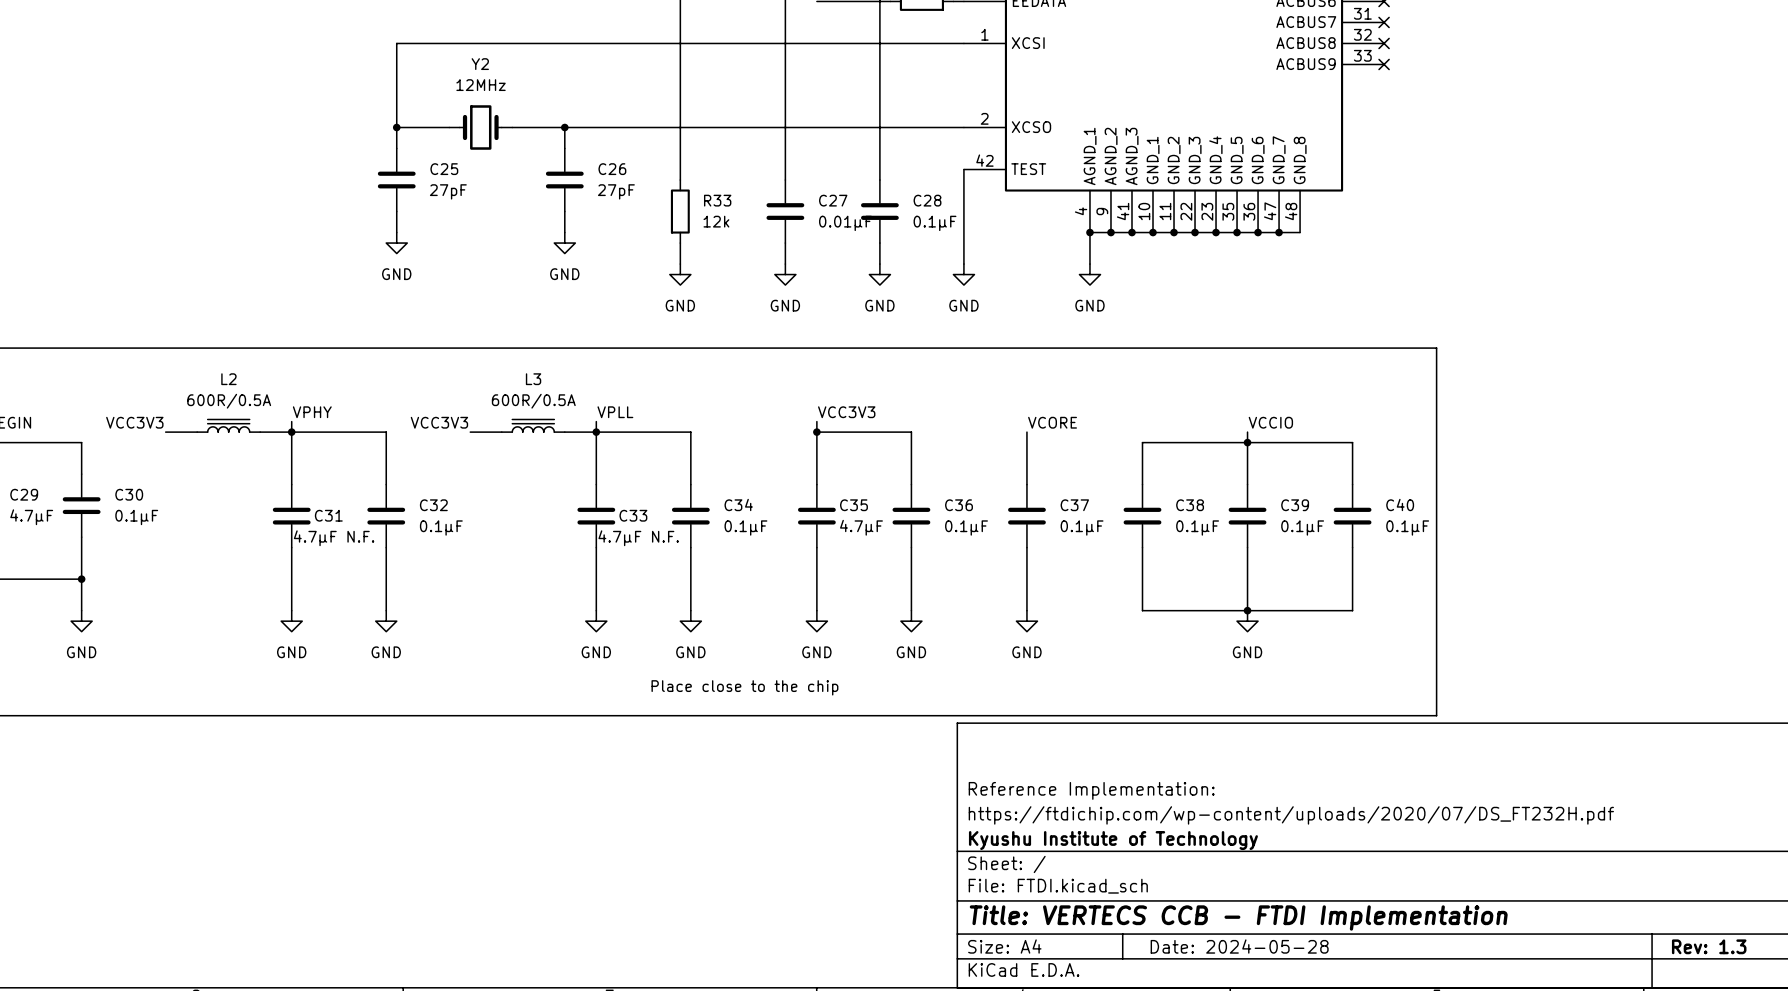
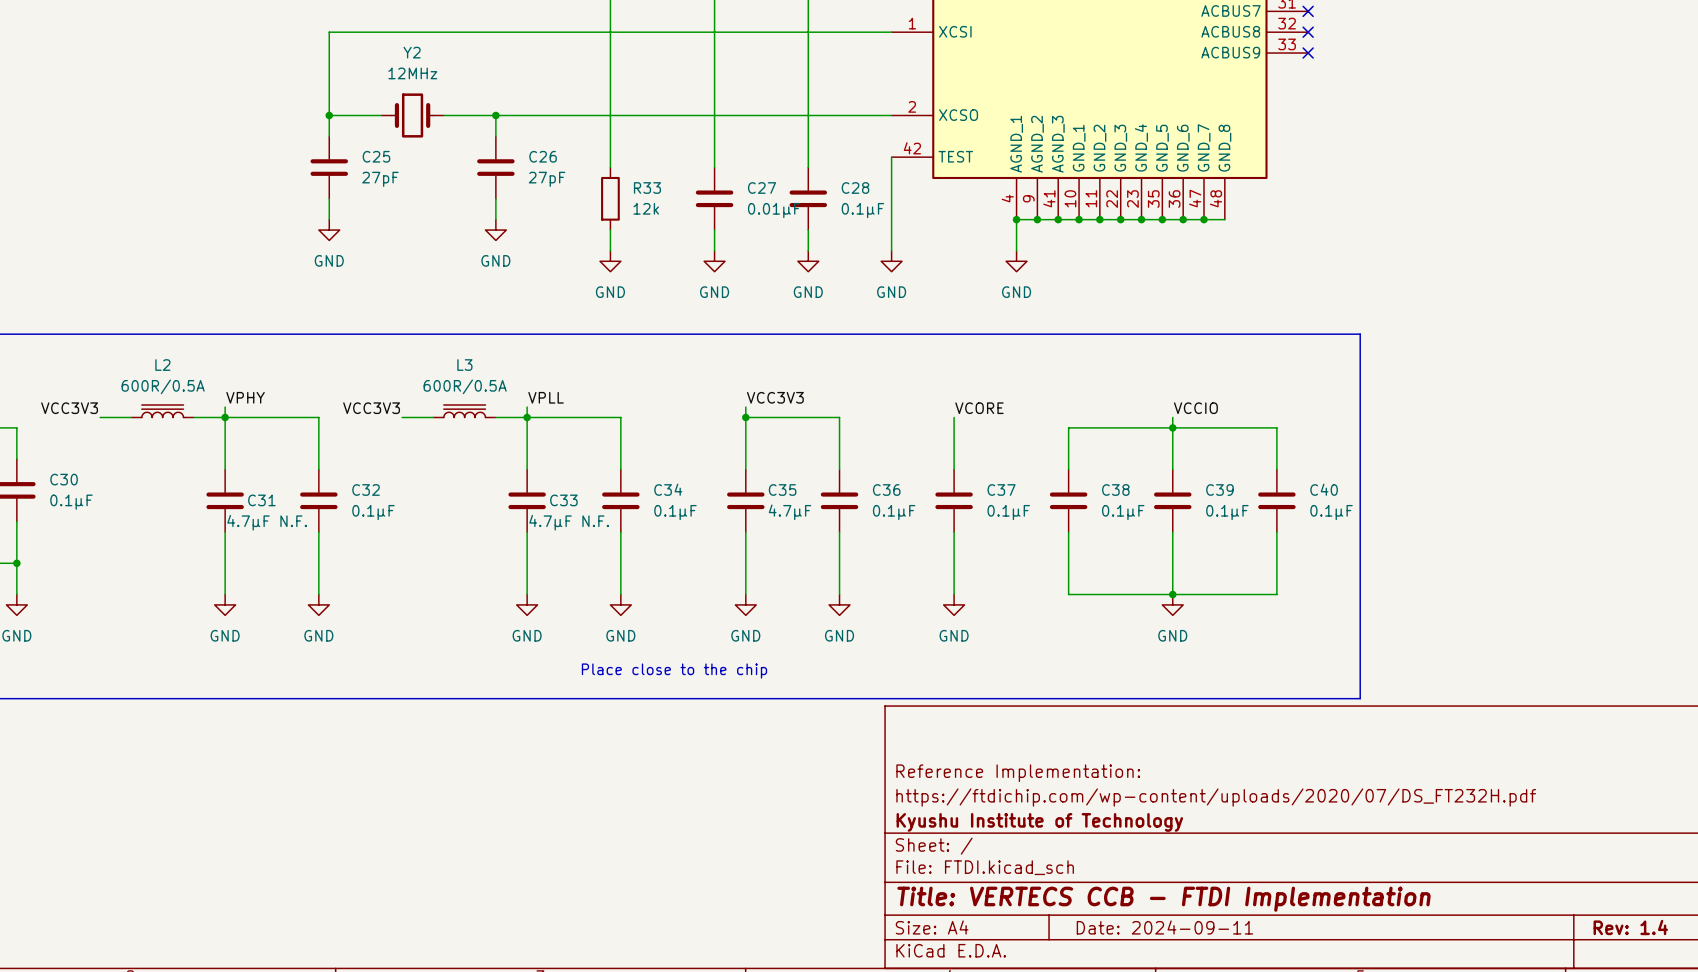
title block: Date: 2024-05-28 (1239, 946) -> Date: 2024-09-11 (1164, 927)
title block: Rev: 1.3 (1709, 946) -> Rev: 1.4 (1630, 927)

